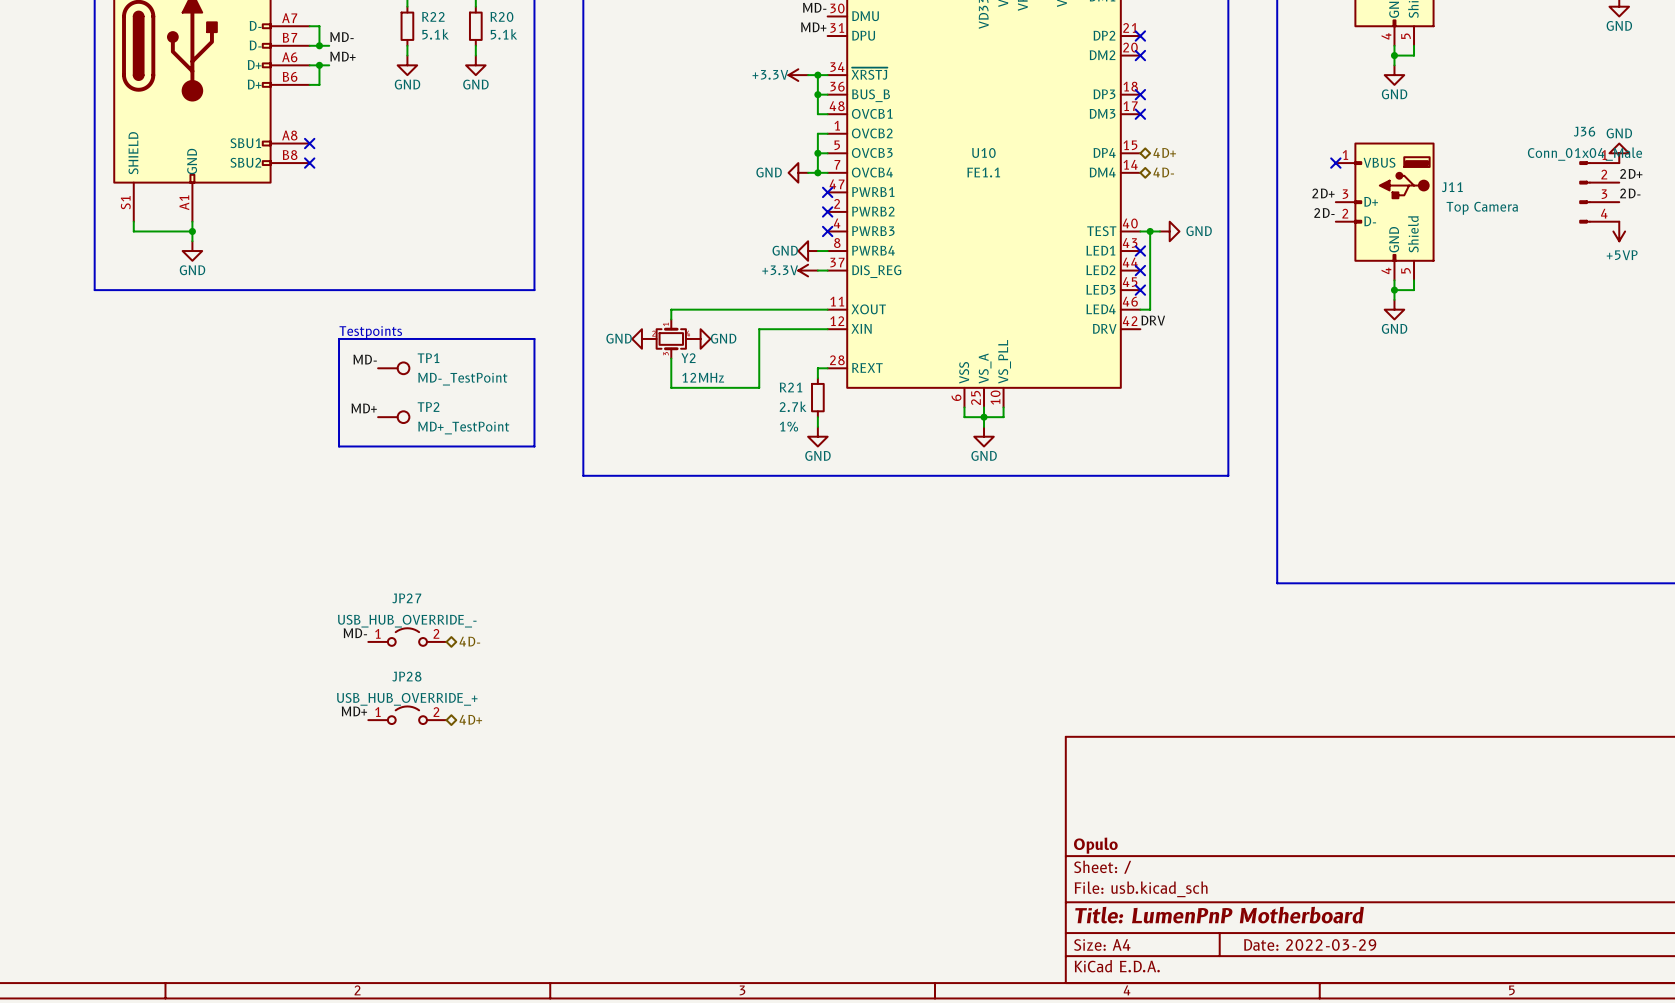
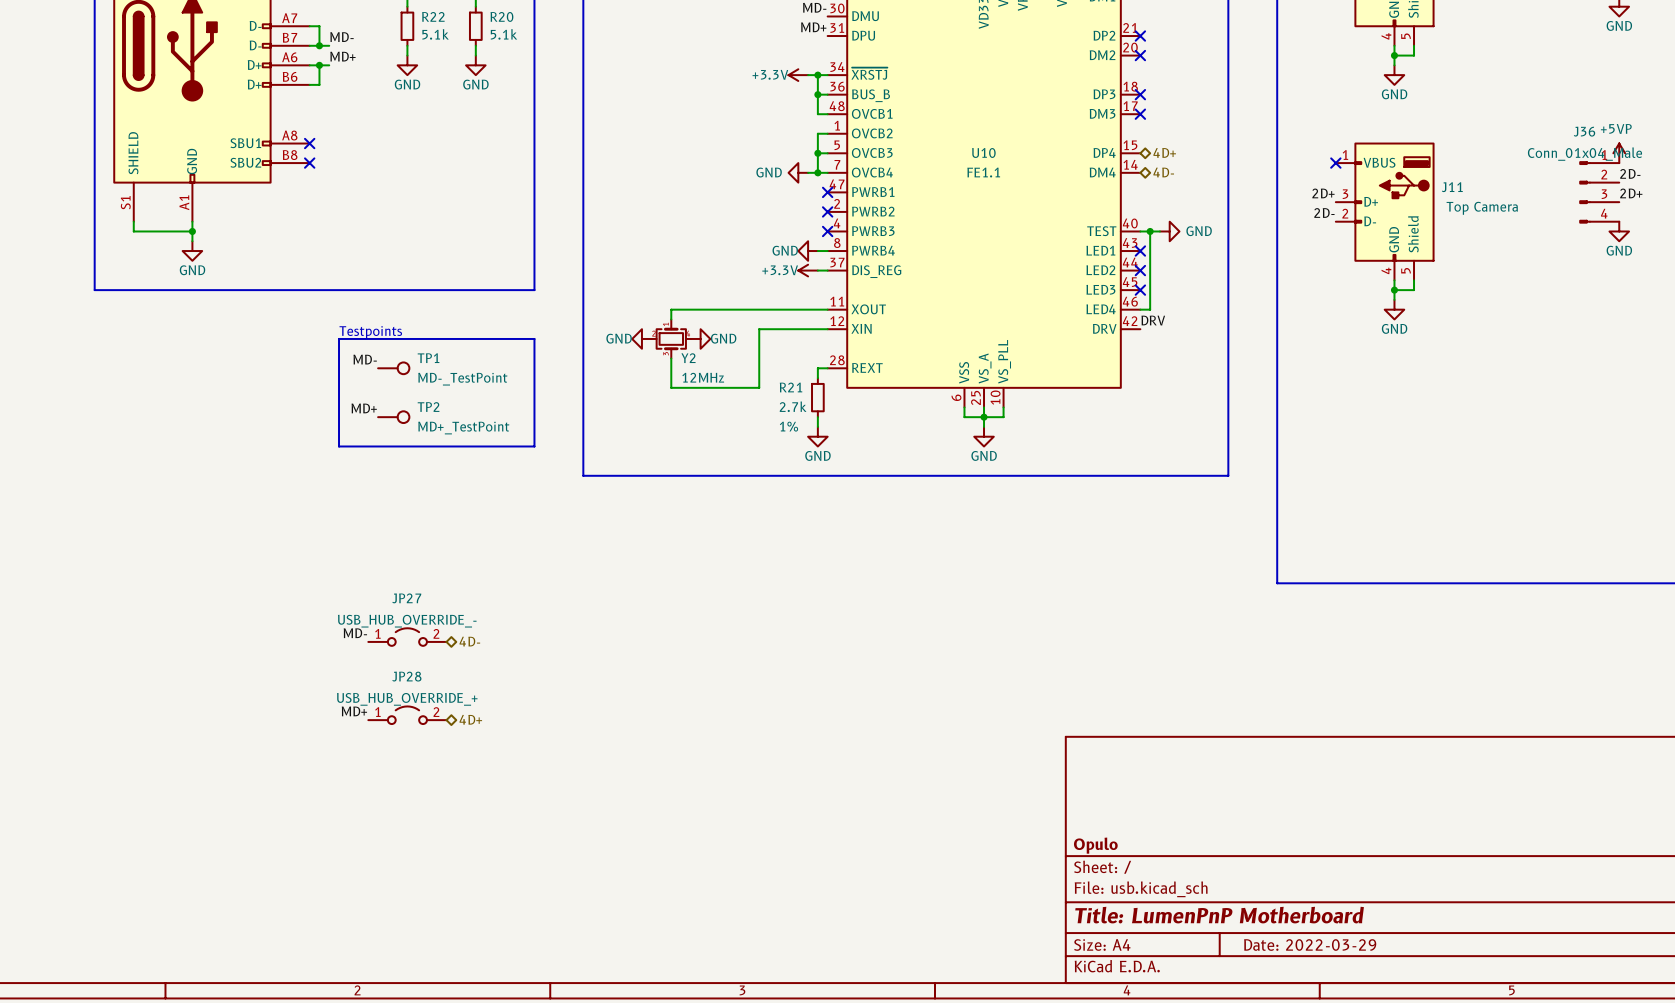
power symbol: GND (1619, 153) -> +5VP (1619, 153)
label: 2D+ (1631, 173) -> 2D- (1630, 173)
label: 2D- (1630, 193) -> 2D+ (1631, 193)
power symbol: +5VP (1619, 231) -> GND (1619, 231)

